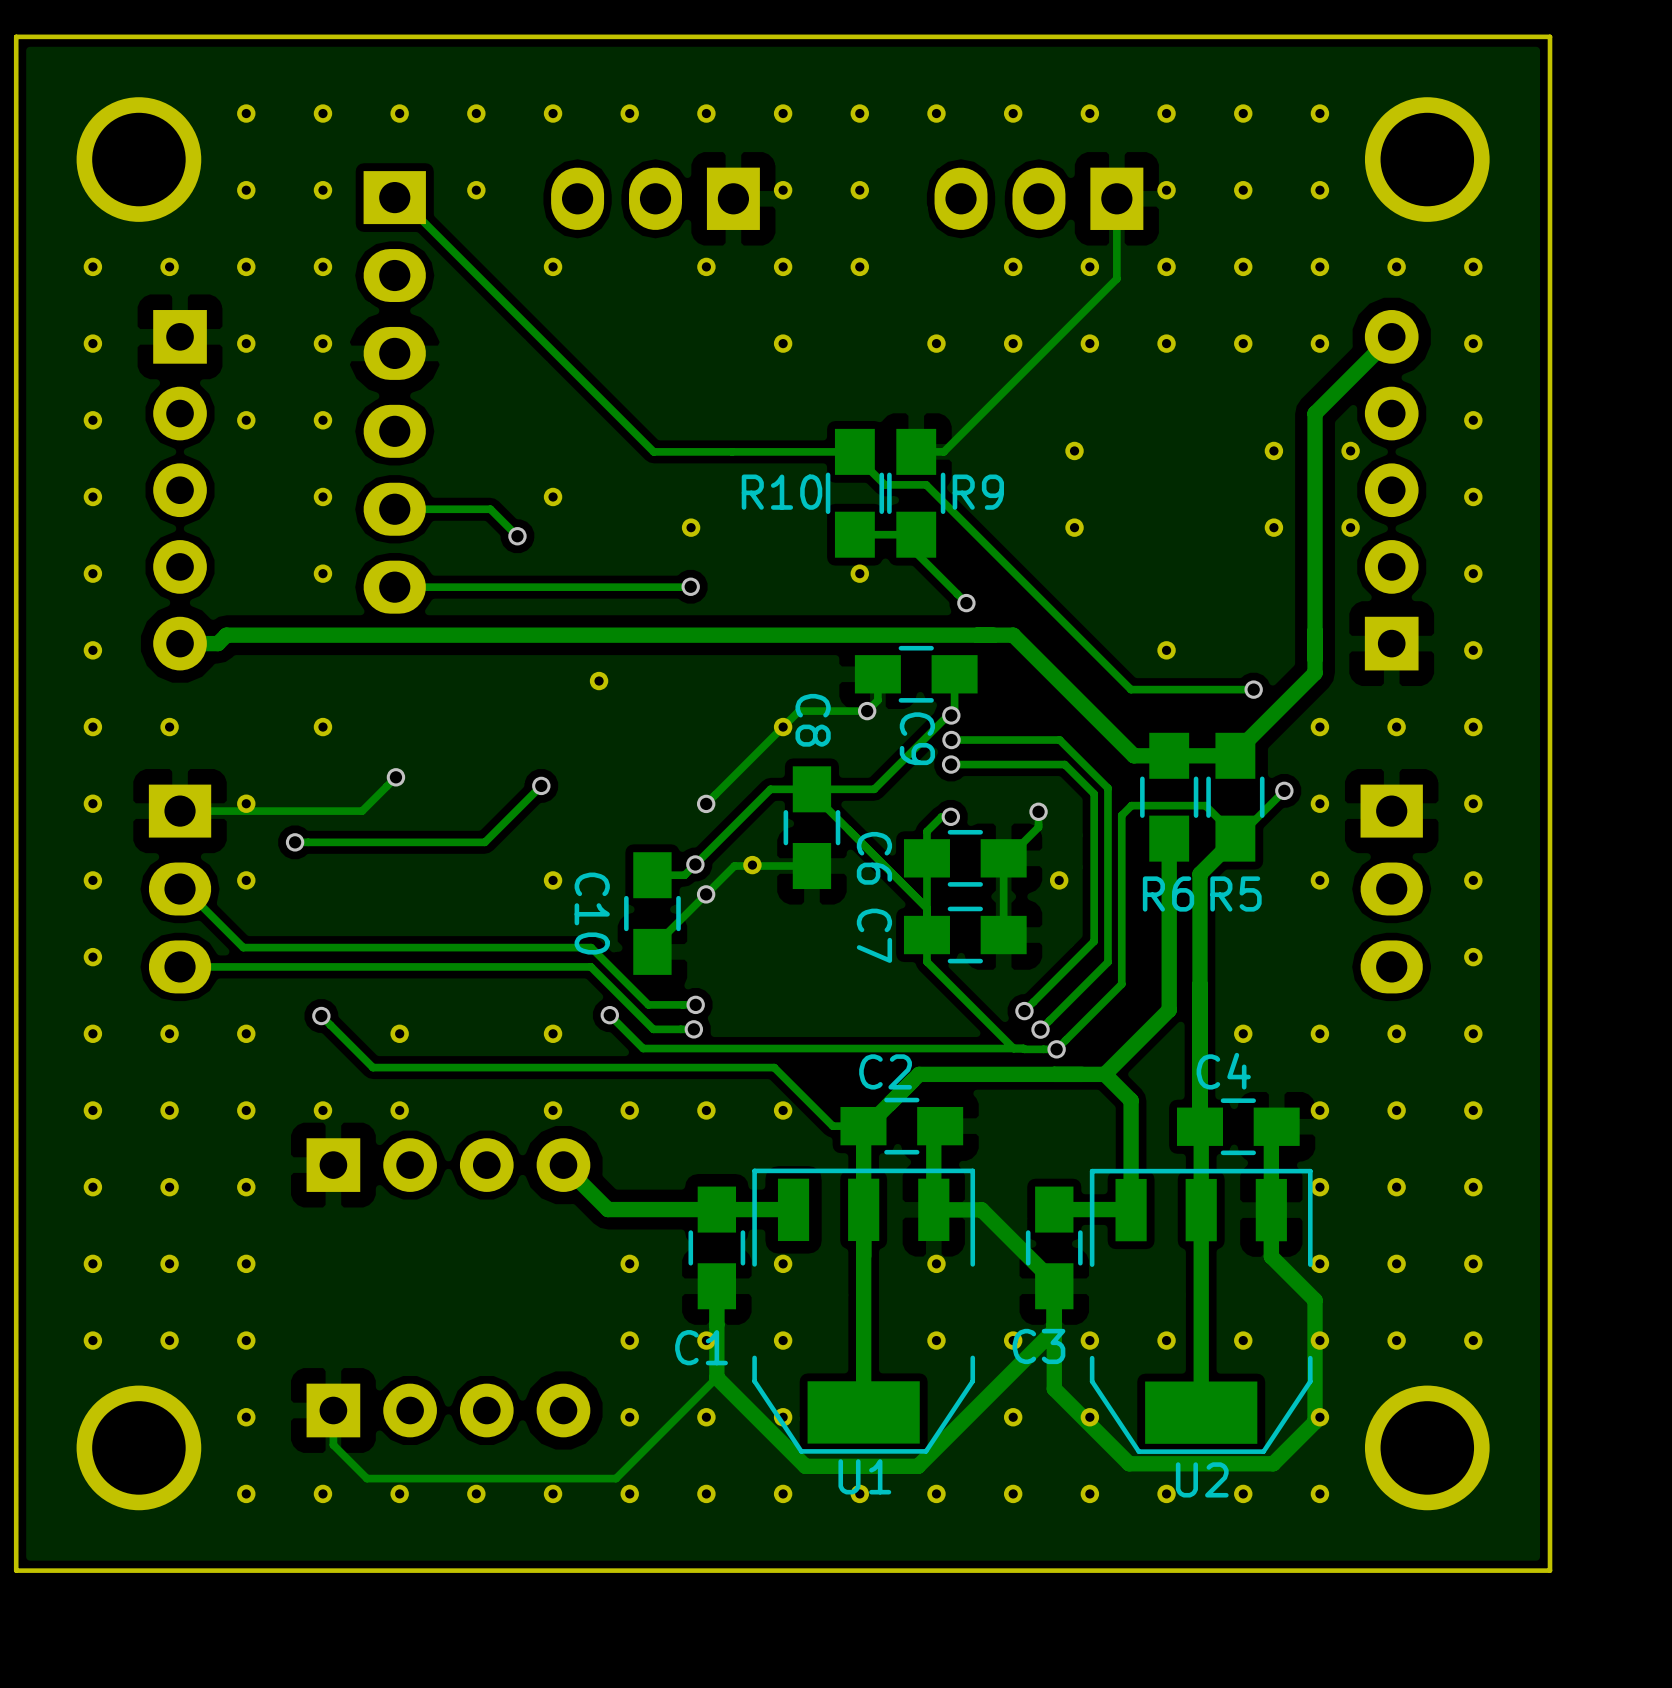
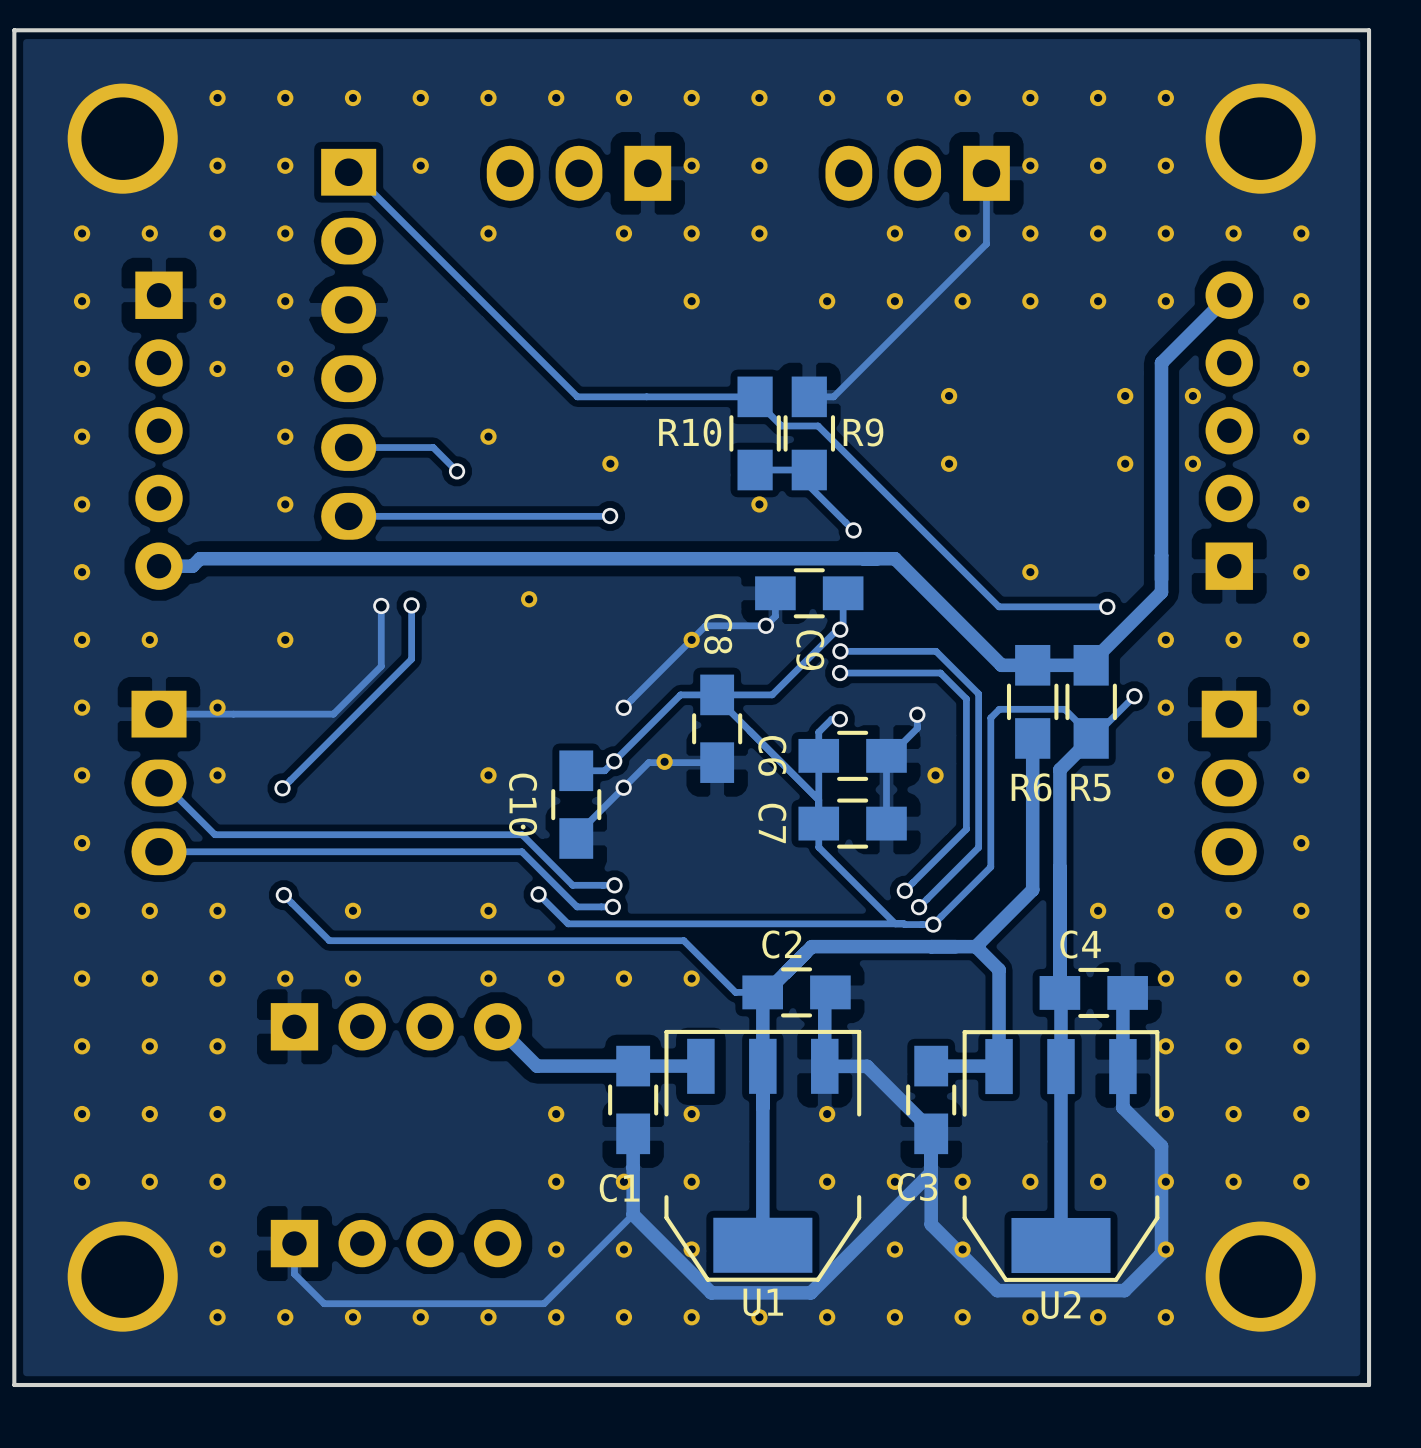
via: none -> (381, 605)
track: none -> (411, 605) (411, 659) (282, 788)
via: none -> (411, 605)
track: (395, 777) (362, 811) -> (381, 605) (381, 666) (333, 714) (319, 714)
via: (395, 777) -> none
track: (541, 785) (484, 842) (295, 842) -> none
via: (541, 785) -> none
via position: (295, 842) -> (282, 788)

